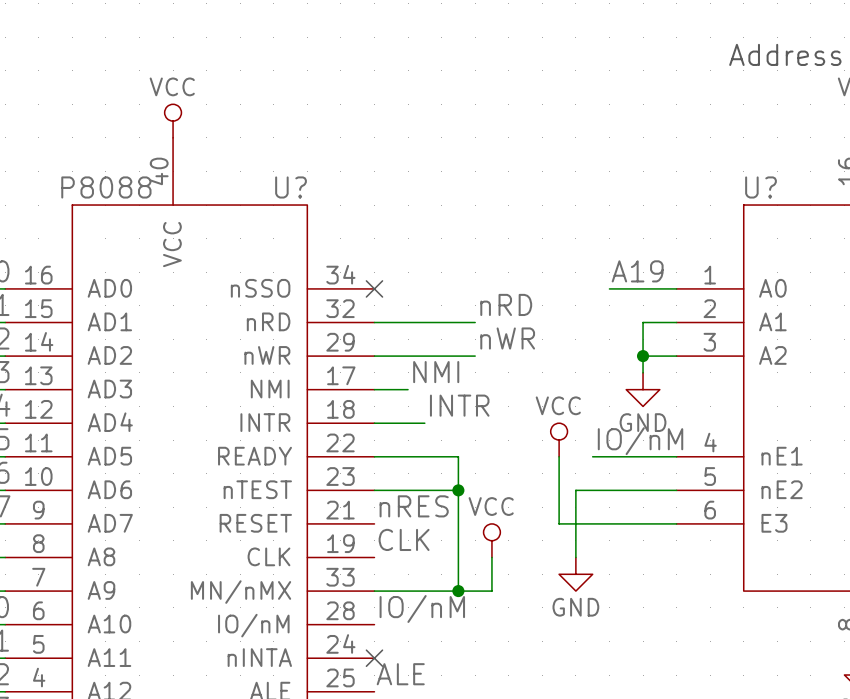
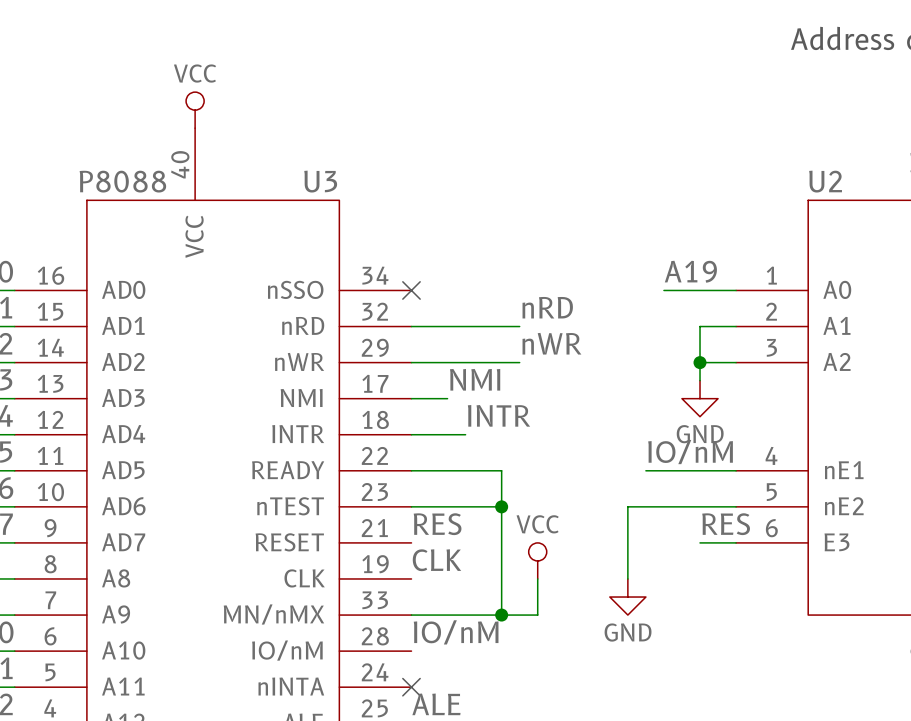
U? name: U? (291, 187) -> U3 (320, 181)
U? name: U? (761, 187) -> U2 (825, 181)
power symbol: VCC (559, 440) -> none
wire: (559, 456) (559, 523) (643, 523) -> none
label: nRES (414, 506) -> RES (437, 524)
label: none -> RES (726, 524)

